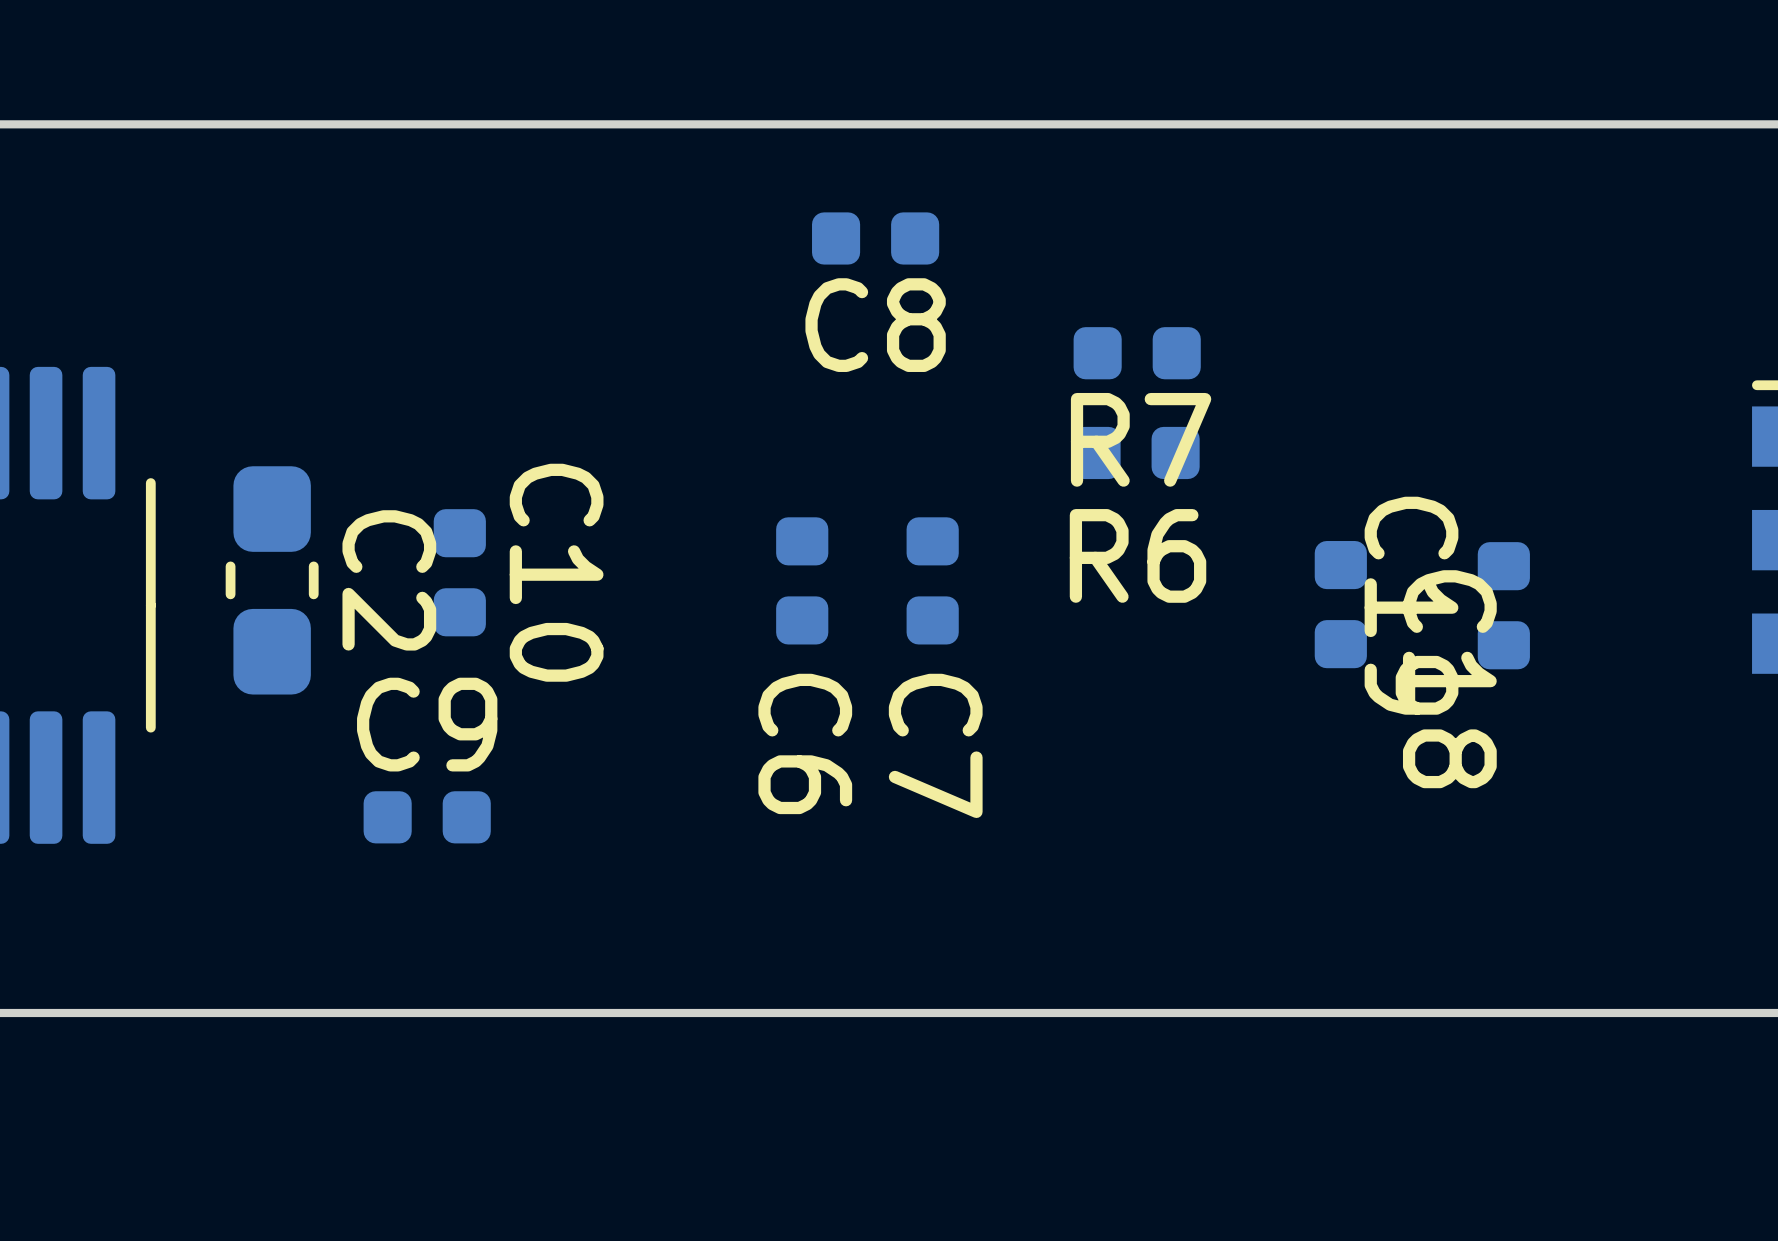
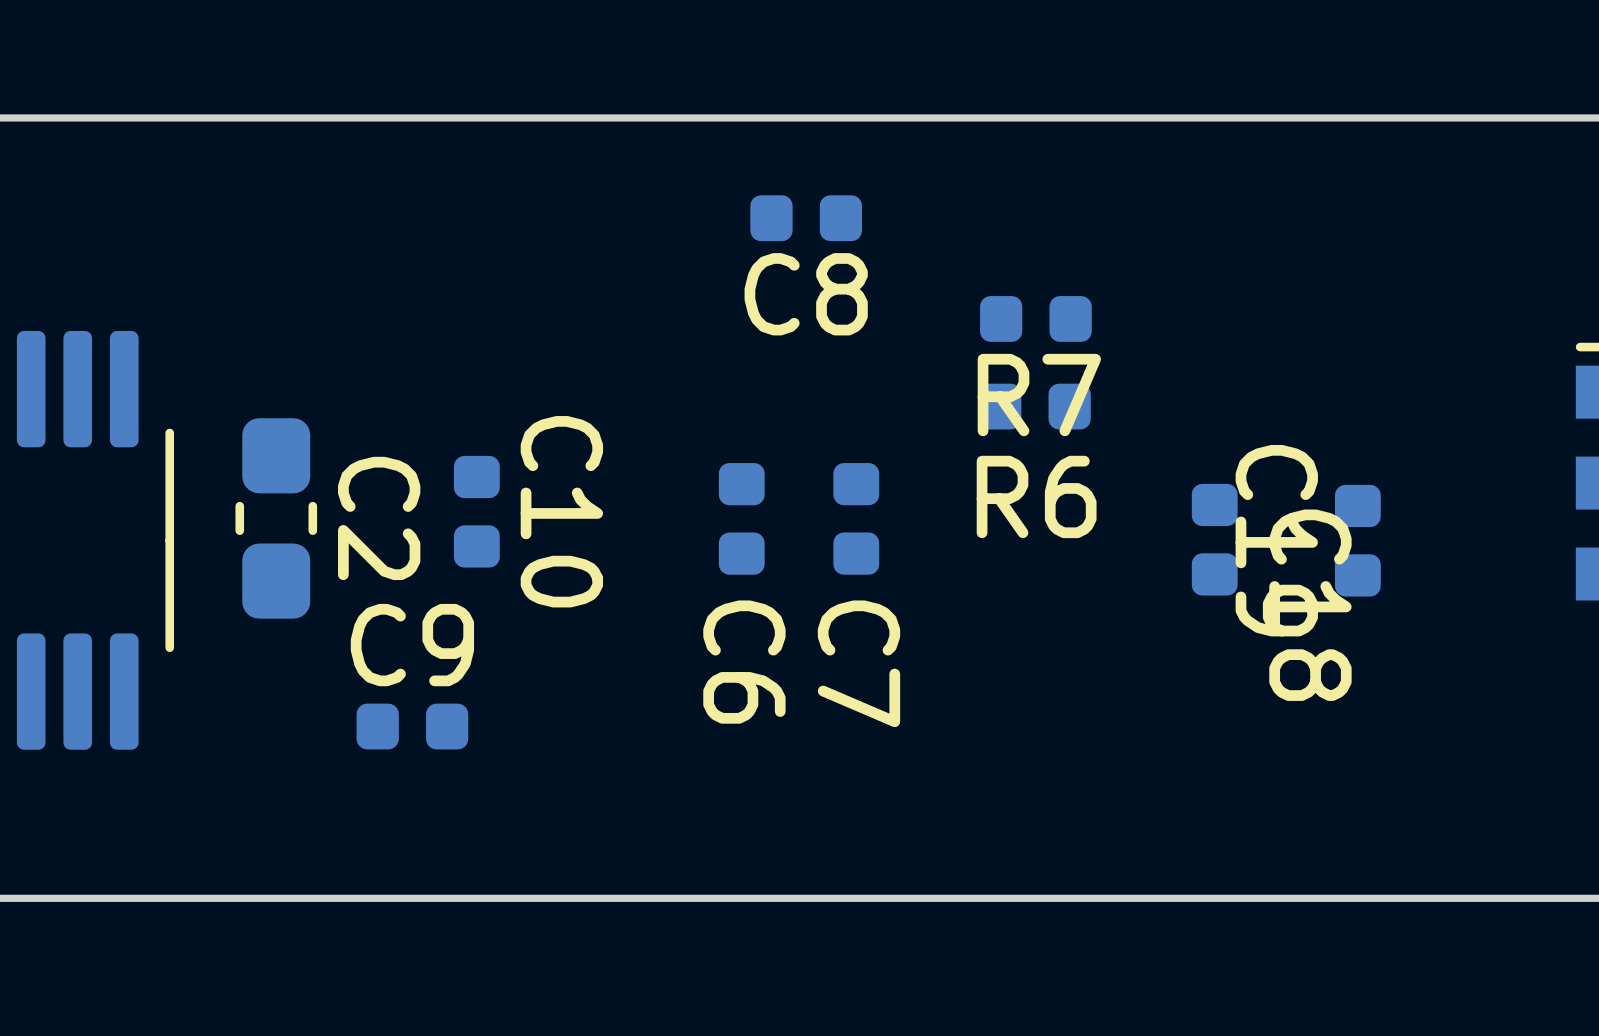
C10 position: (459, 572) -> (476, 511)

